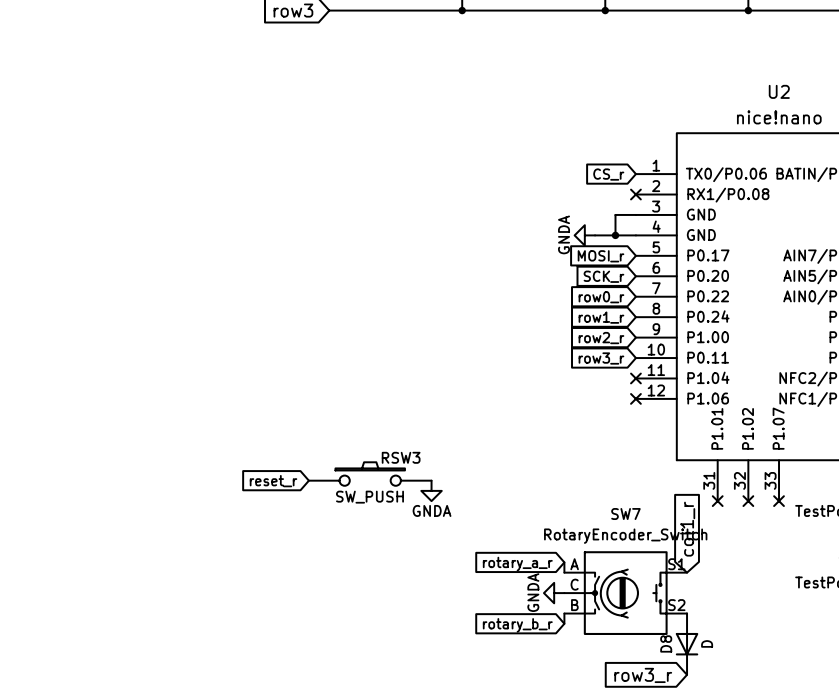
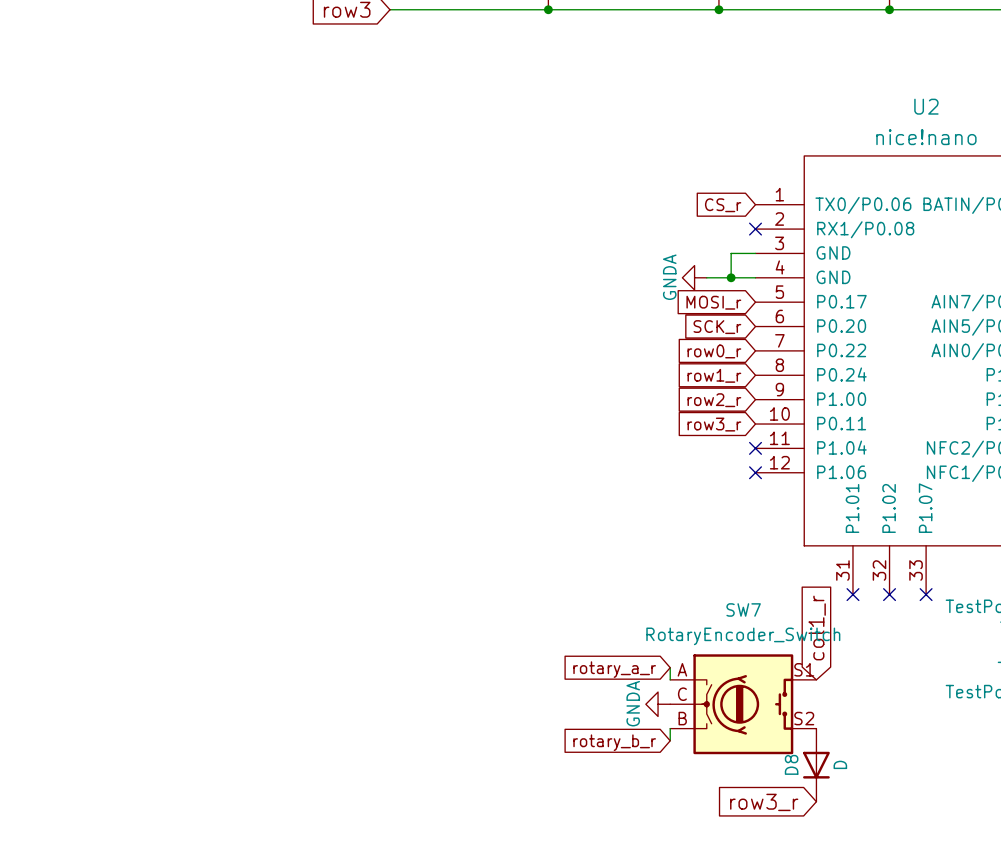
RSW3: SW_PUSH (370, 474) -> none
global label: reset_r (273, 481) -> none
power symbol: GNDA (431, 490) -> none

